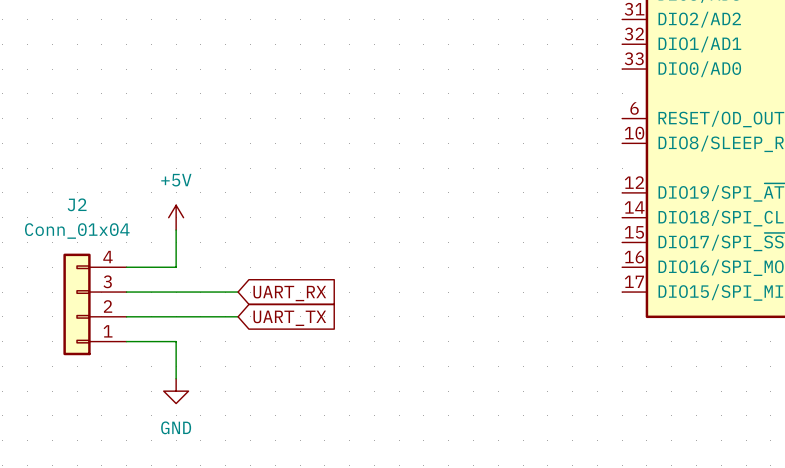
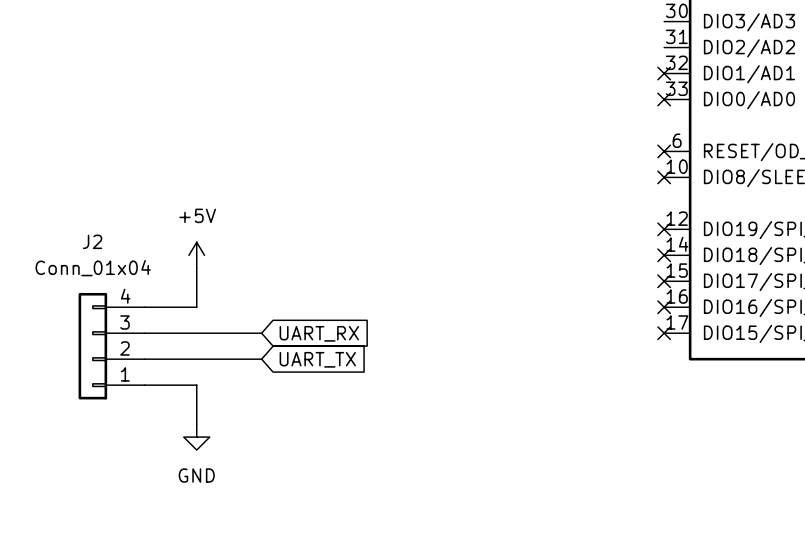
no-connect mark: none -> (664, 73)
no-connect mark: none -> (664, 99)
no-connect mark: none -> (664, 151)
no-connect mark: none -> (664, 177)
no-connect mark: none -> (664, 229)
no-connect mark: none -> (664, 255)
no-connect mark: none -> (664, 281)
no-connect mark: none -> (664, 307)
no-connect mark: none -> (664, 333)

